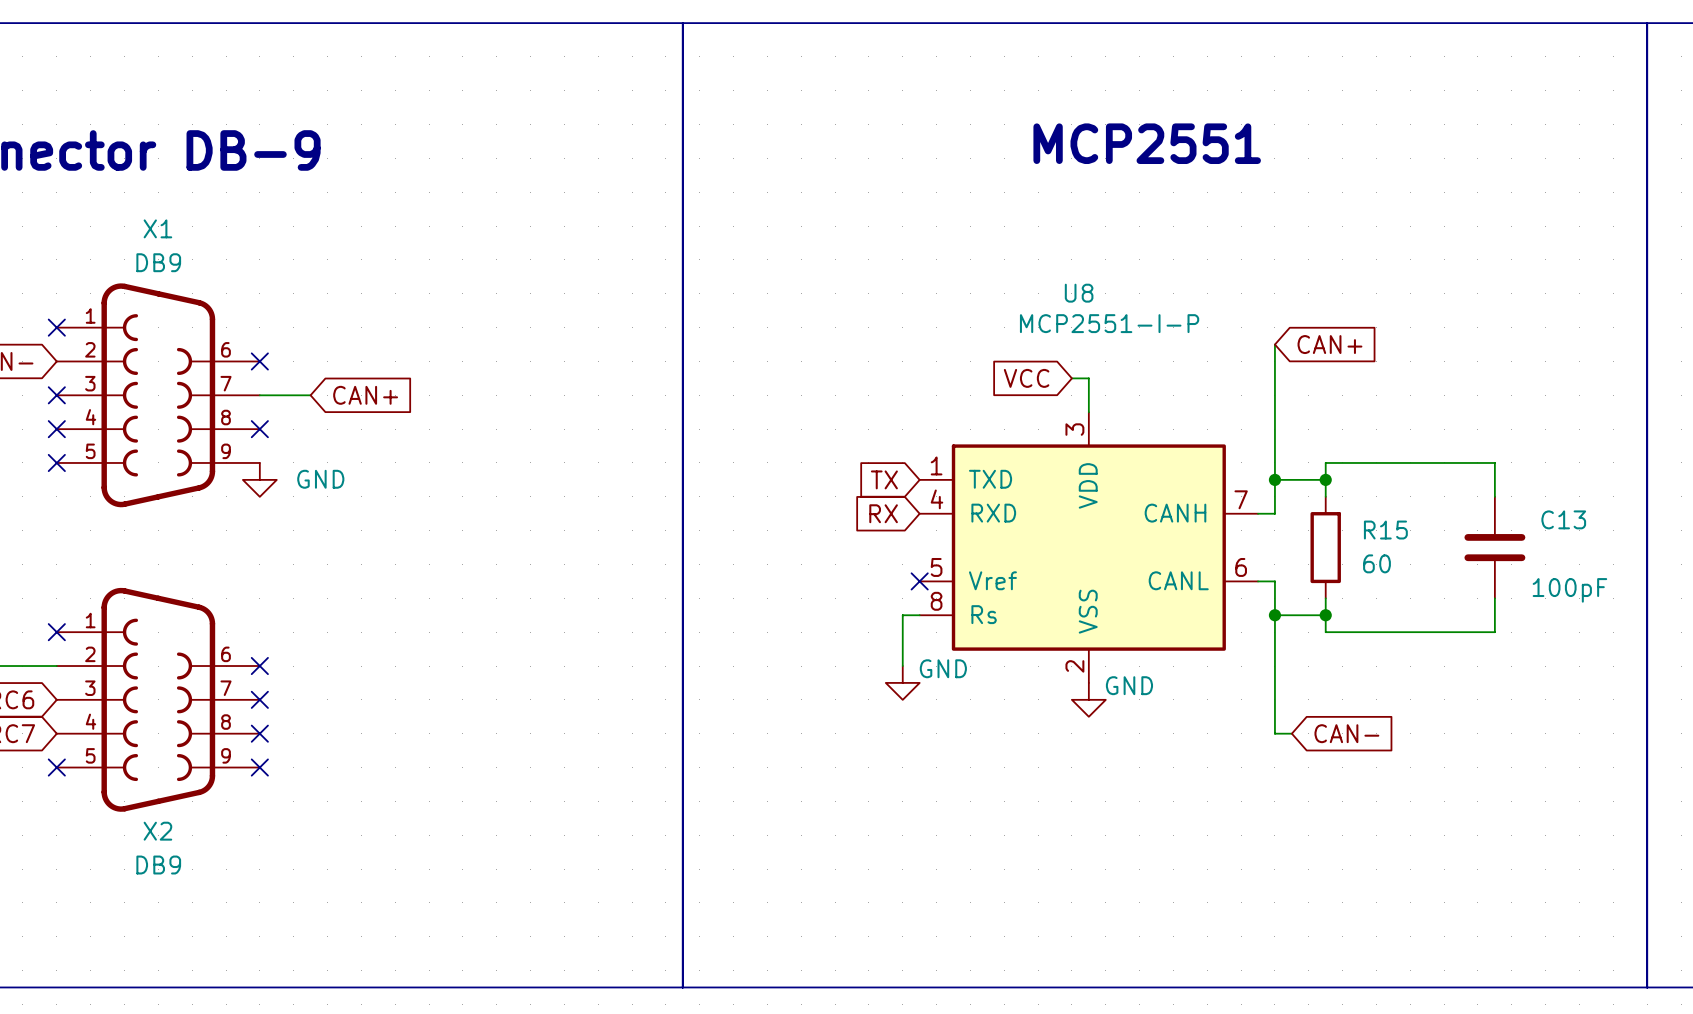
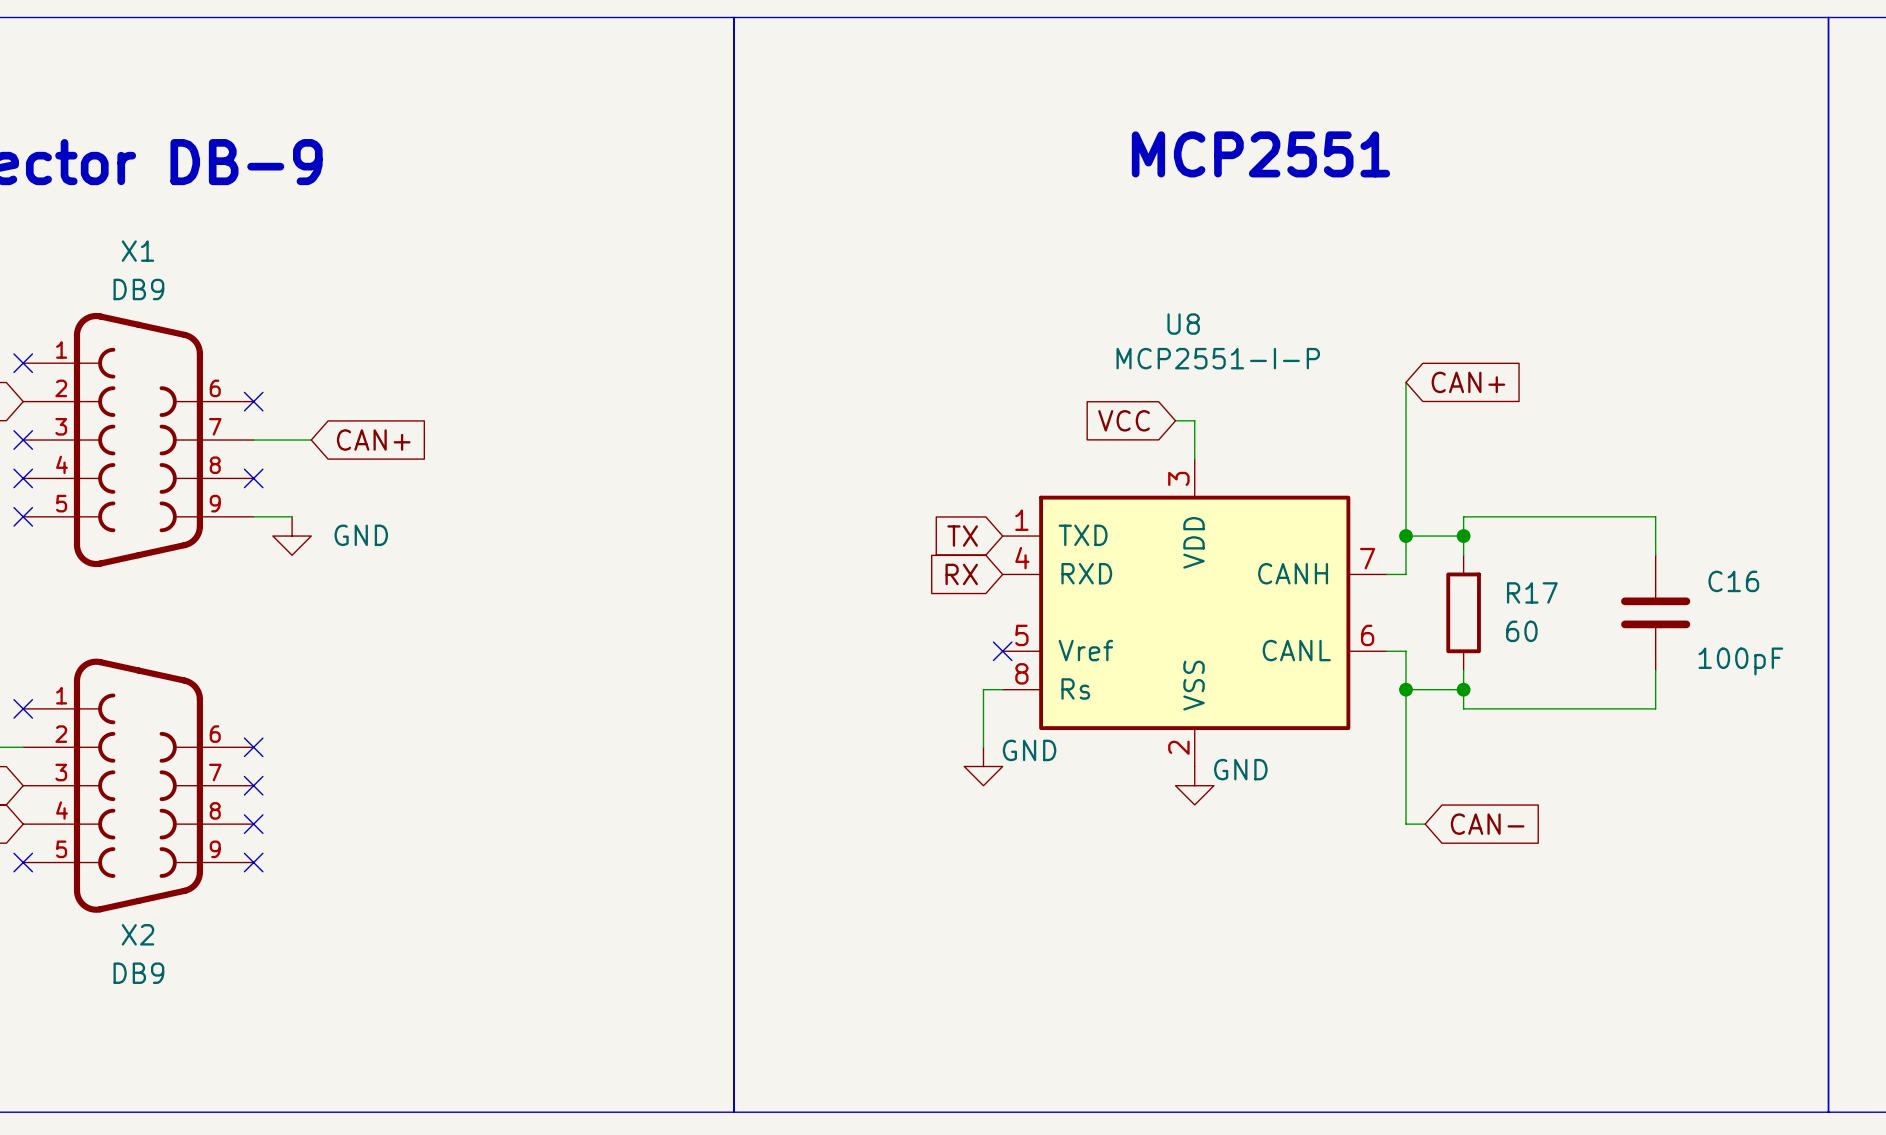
wire: none -> (253, 516) (292, 516)
power symbol position: GND (259, 479) -> GND (292, 536)
C13 name: C13 (1563, 519) -> C16 (1733, 581)
R15 name: R15 (1385, 530) -> R17 (1532, 592)

